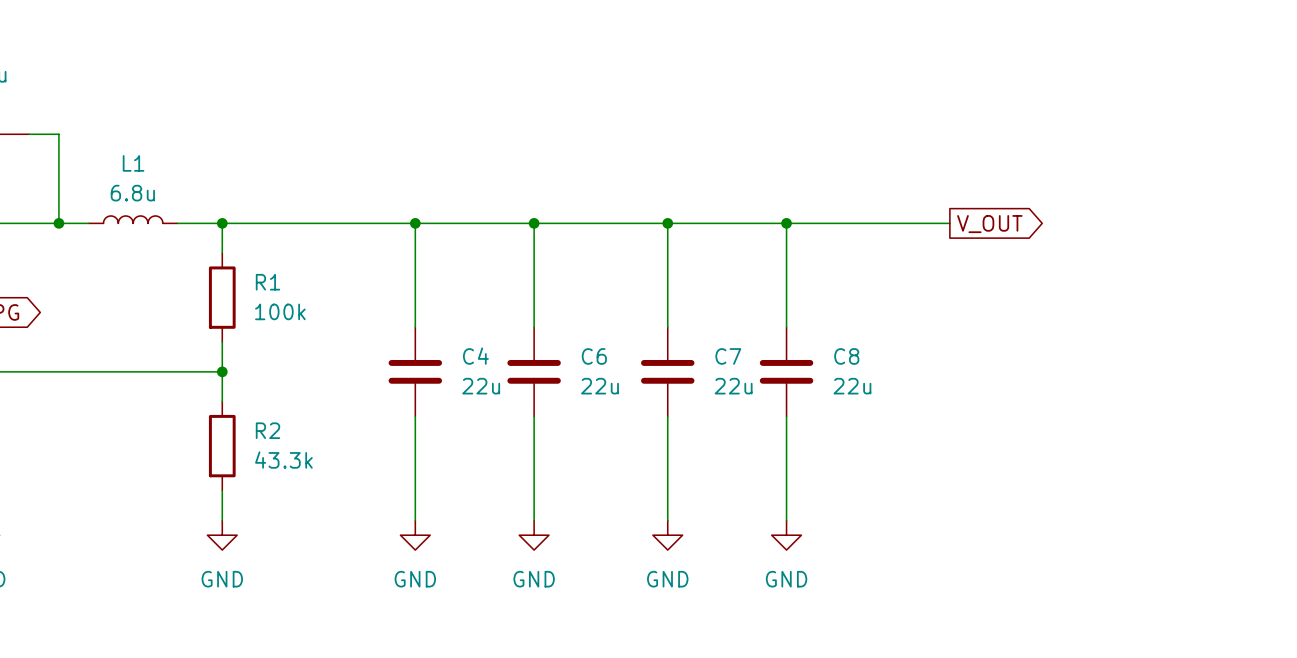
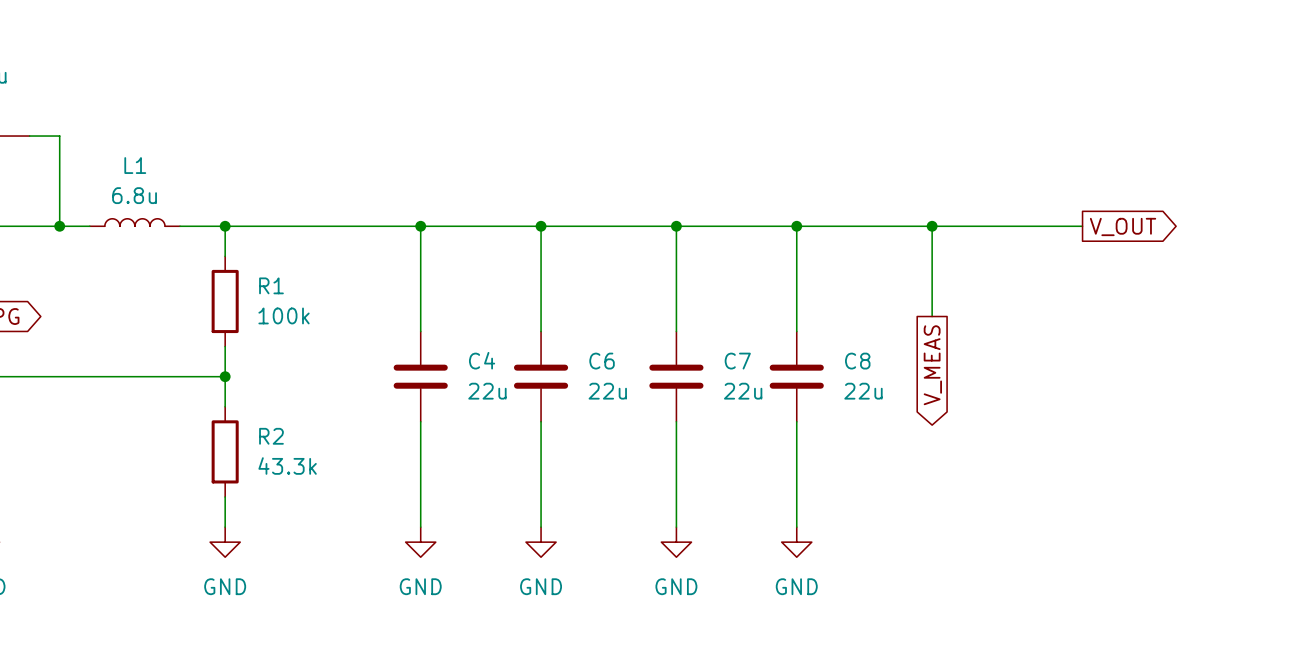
wire: none -> (932, 226) (932, 316)
junction: none -> (932, 226)
wire: none -> (962, 226) (1082, 226)
global label position: V_OUT (989, 224) -> V_OUT (1123, 226)
global label: none -> V_MEAS (932, 365)

